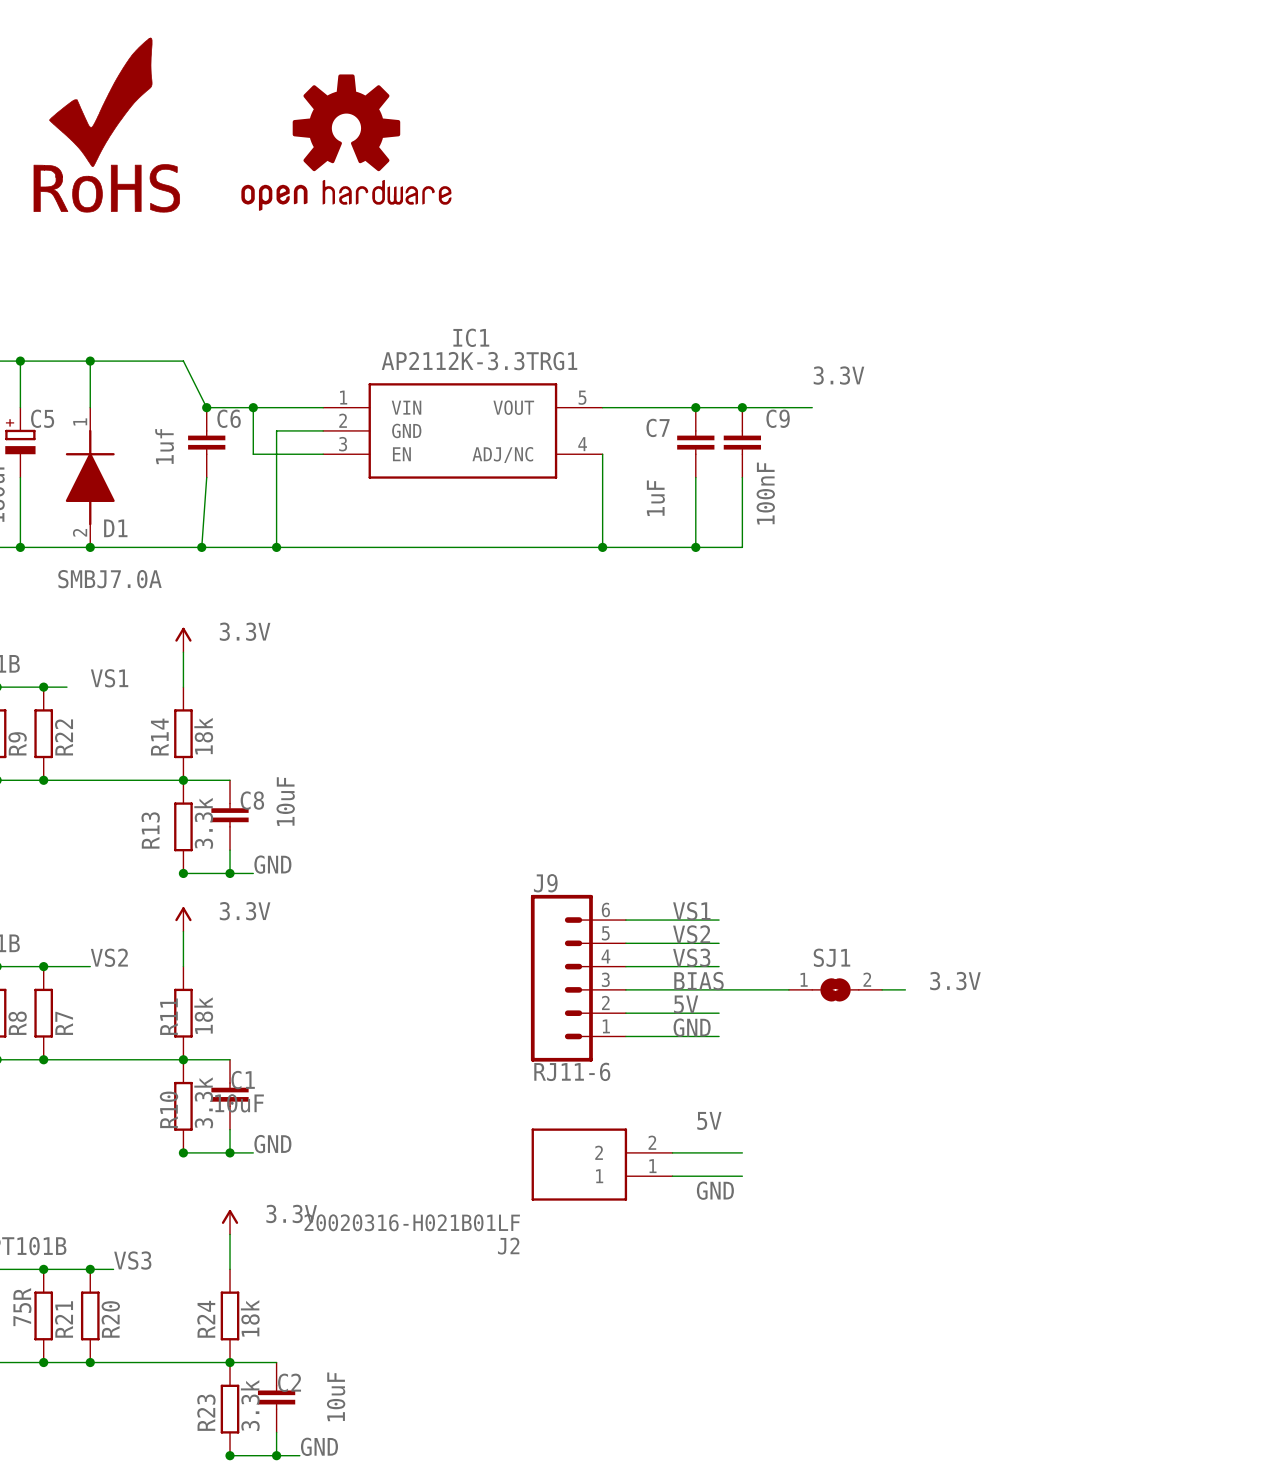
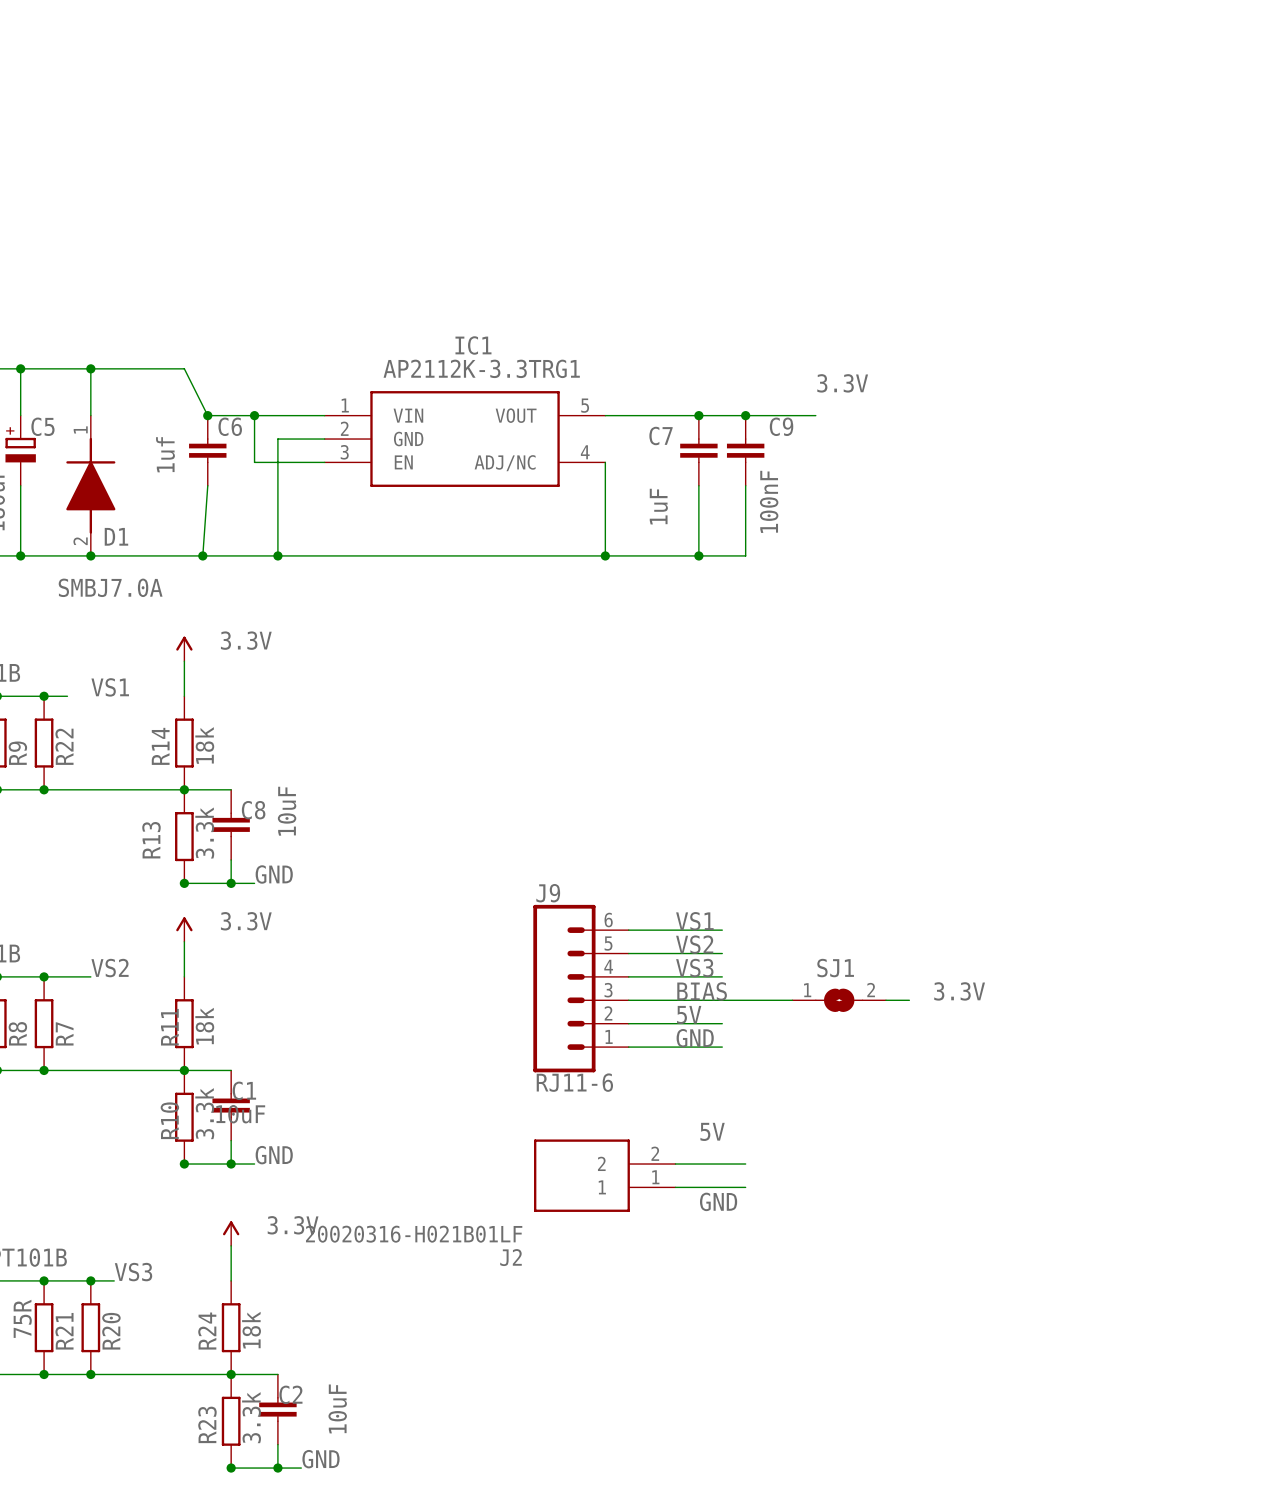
part: (106, 125) -> none
part: (346, 142) -> none

